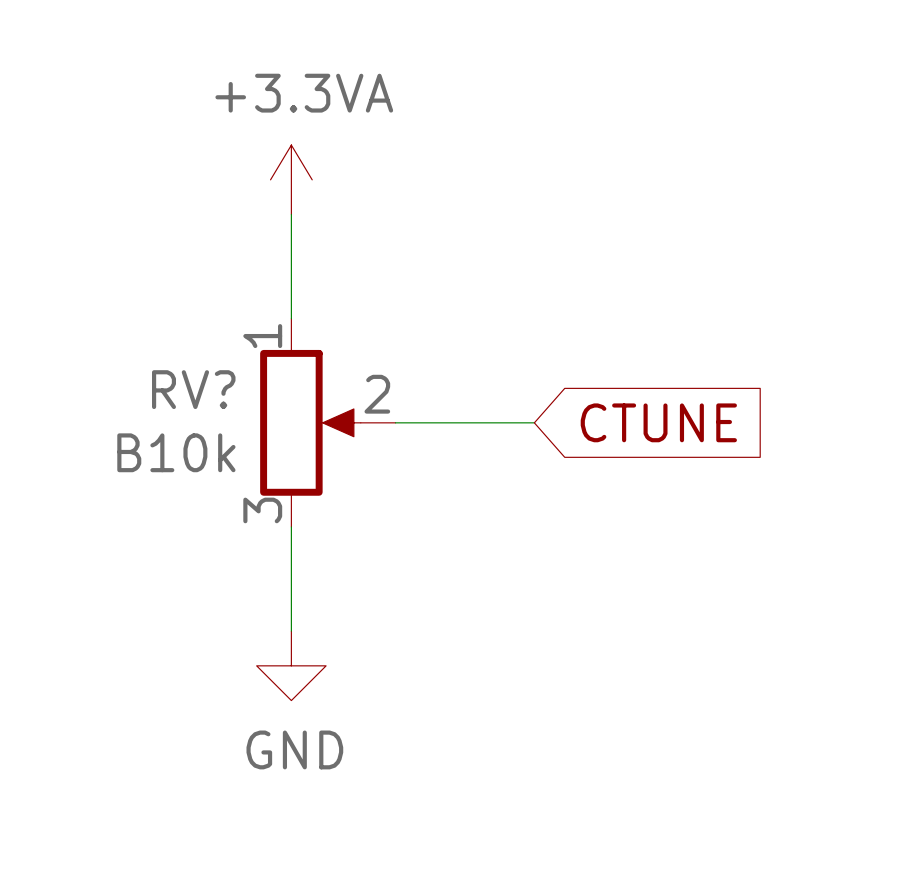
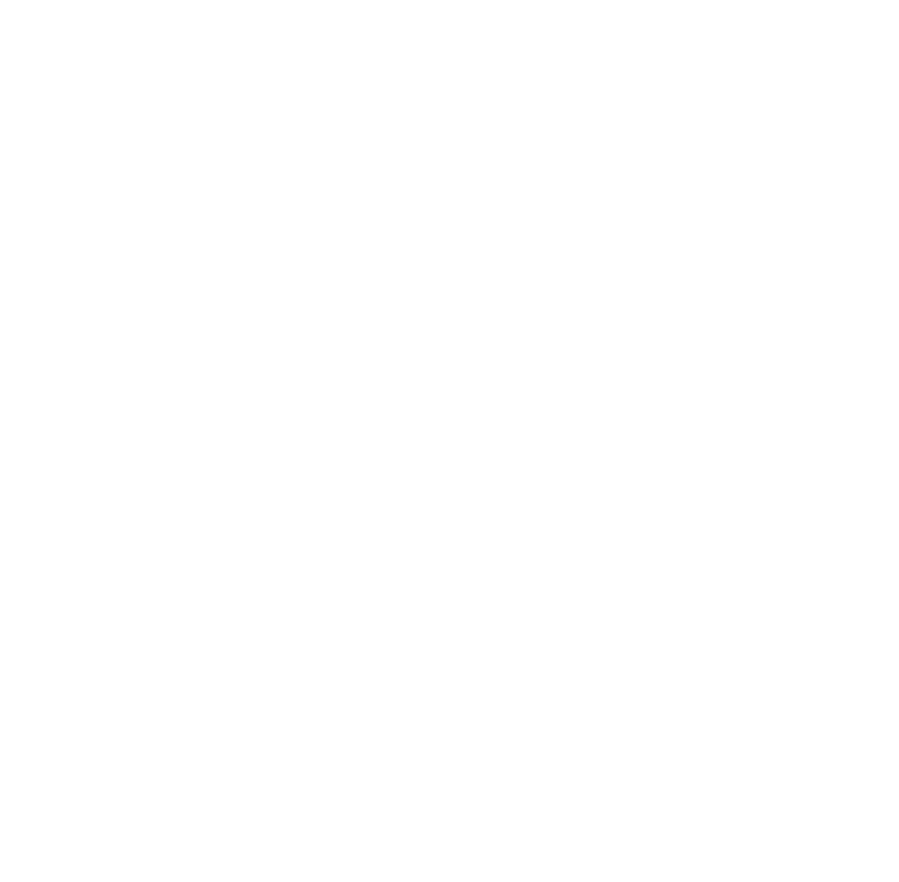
power symbol: +3.3VA (291, 179) -> none
wire: (291, 214) (291, 318) -> none
RV?: B10k (327, 422) -> none
wire: (395, 422) (534, 422) -> none
global label: CTUNE (658, 422) -> none
wire: (291, 526) (291, 631) -> none
power symbol: GND (291, 665) -> none

